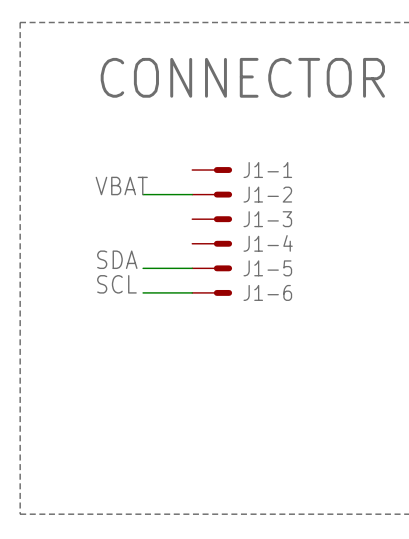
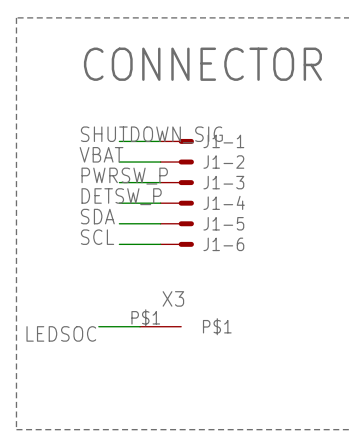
label: none -> SHUTDOWN_SIG (151, 134)
wire: none -> (119, 141) (160, 141)
label: none -> PWRSW_P (124, 176)
wire: none -> (119, 182) (160, 182)
label: none -> DETSW_P (121, 196)
wire: none -> (119, 203) (160, 203)
wire: none -> (98, 326) (139, 326)
X3: none -> (160, 326)
label: none -> LEDSOC (61, 333)

